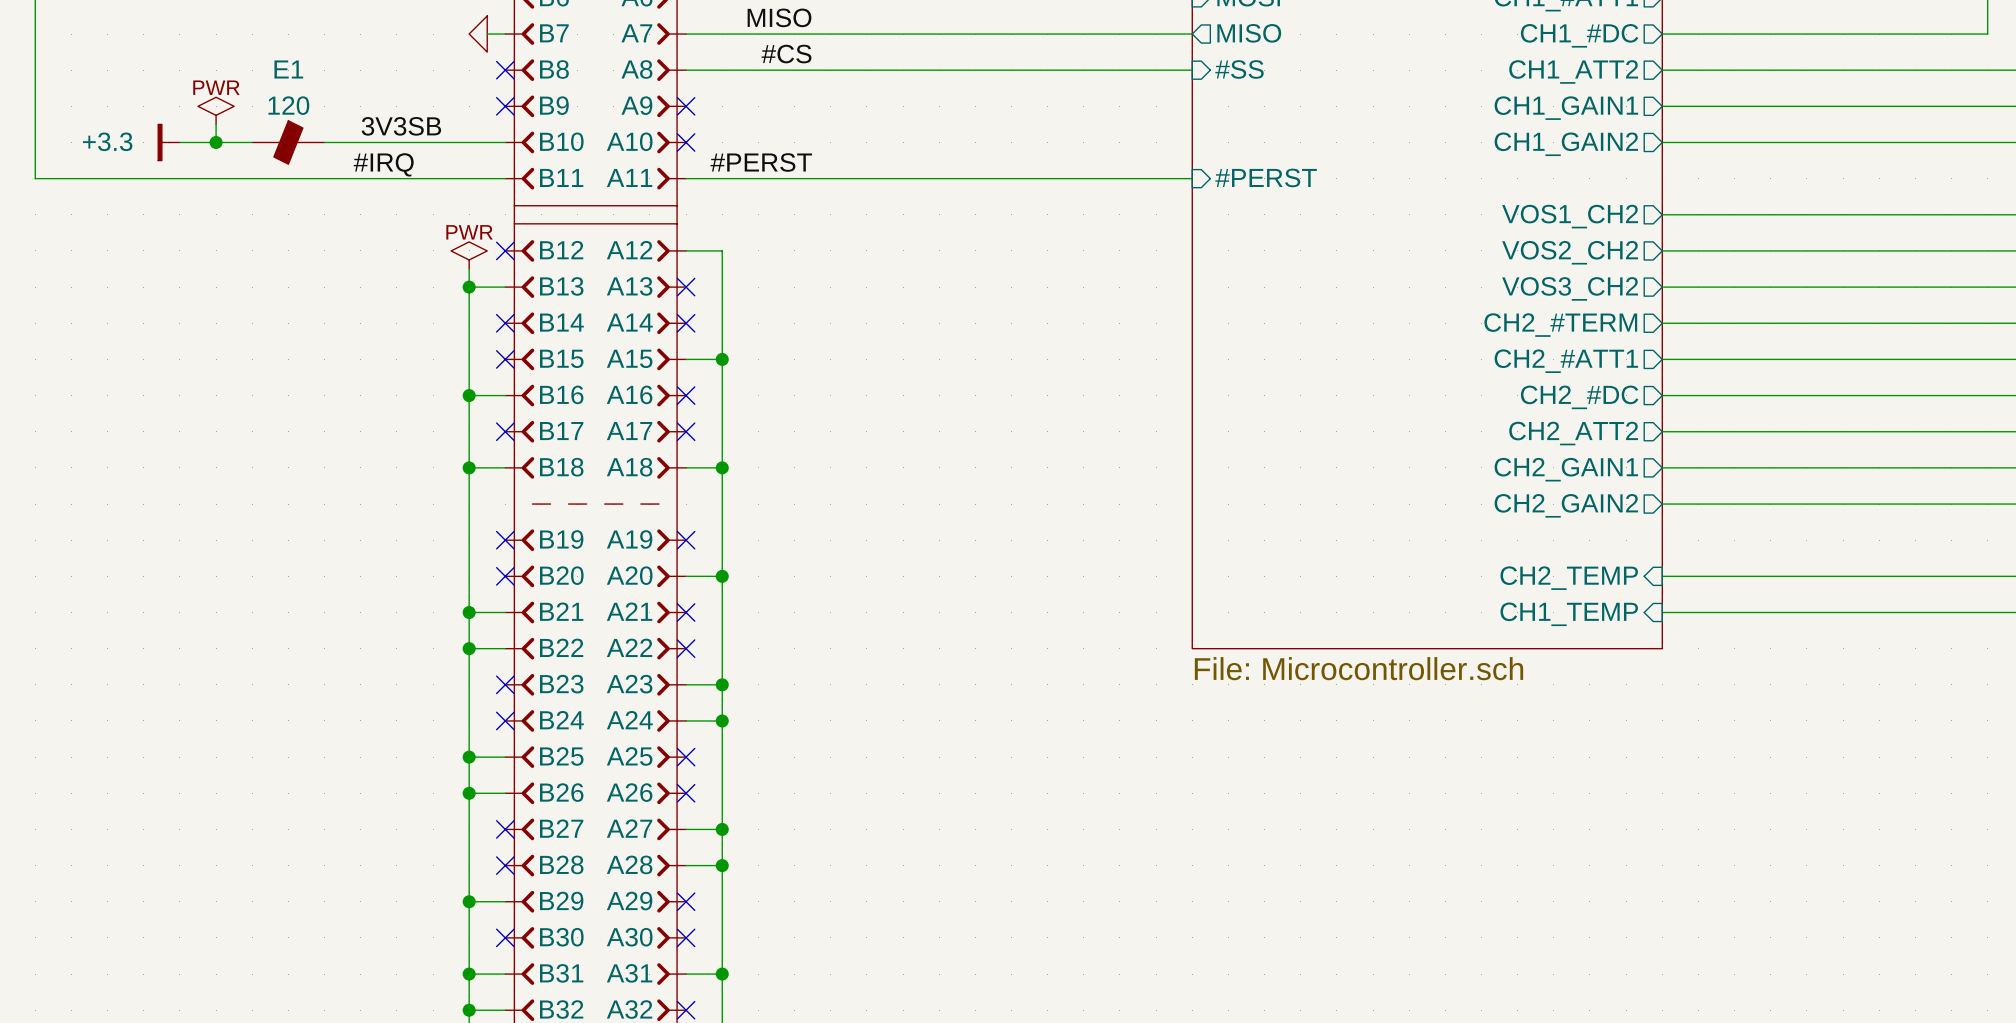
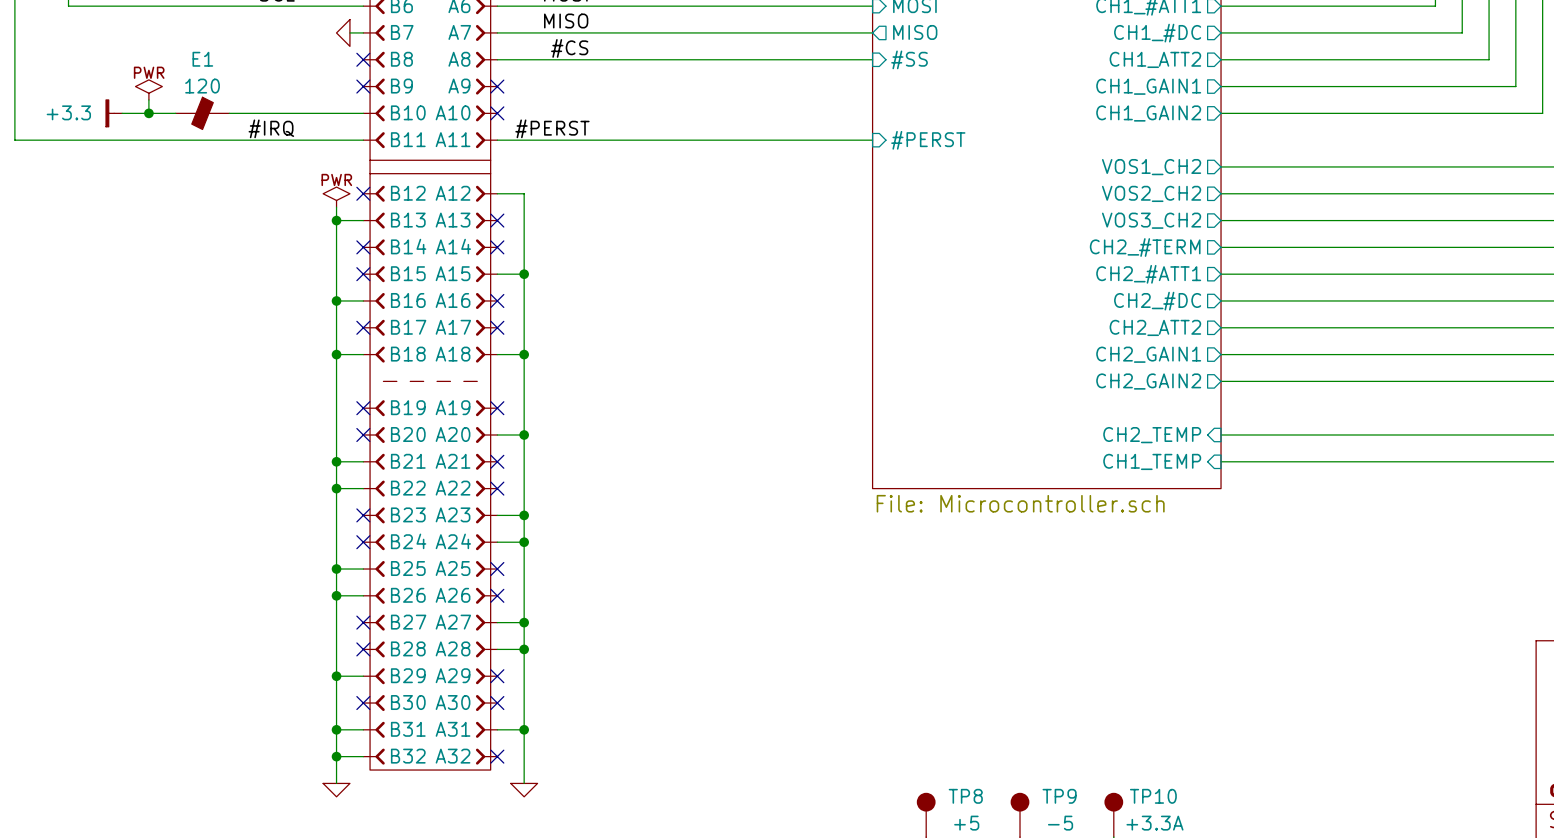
label: 3V3SB (401, 126) -> none

